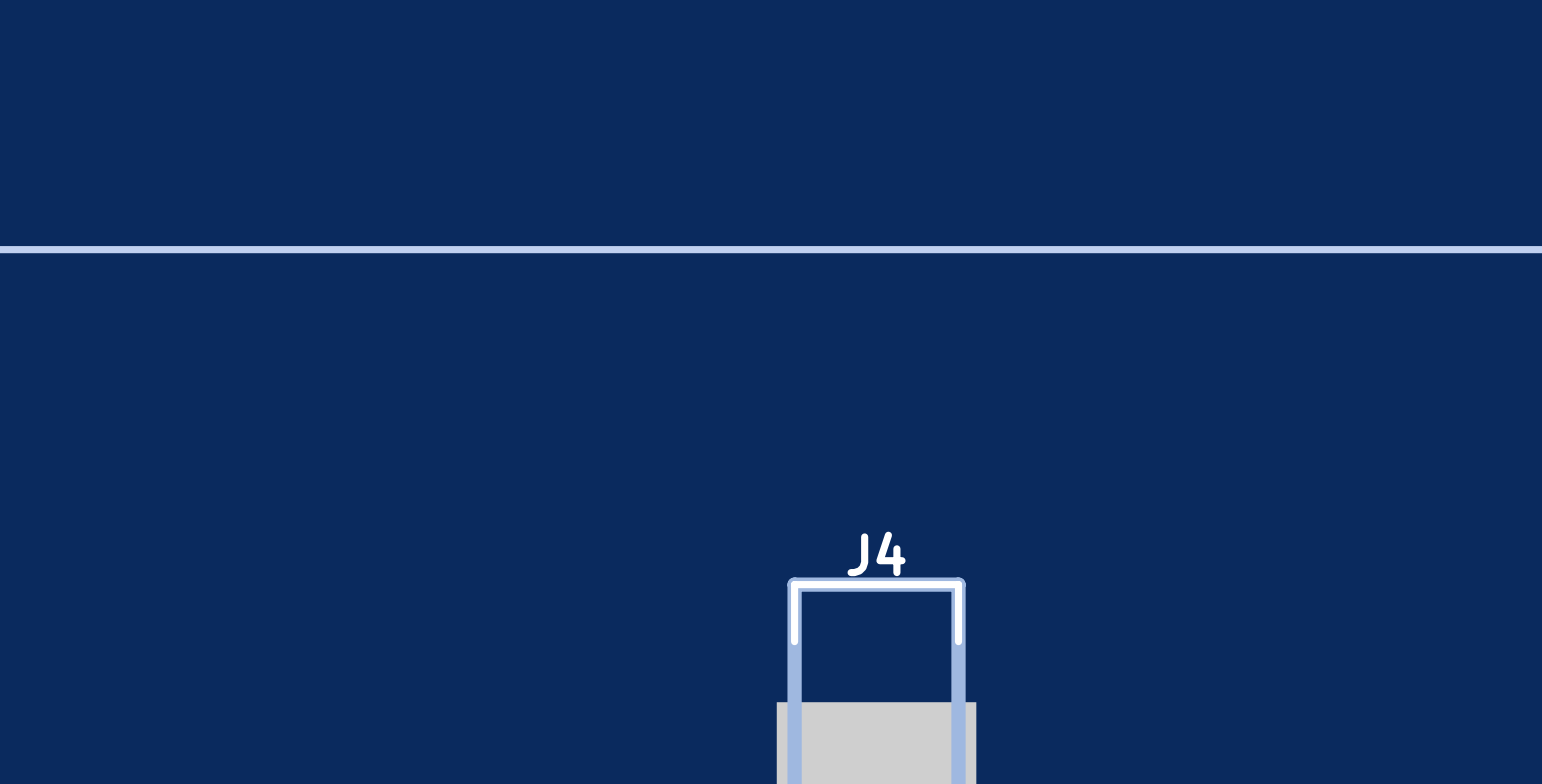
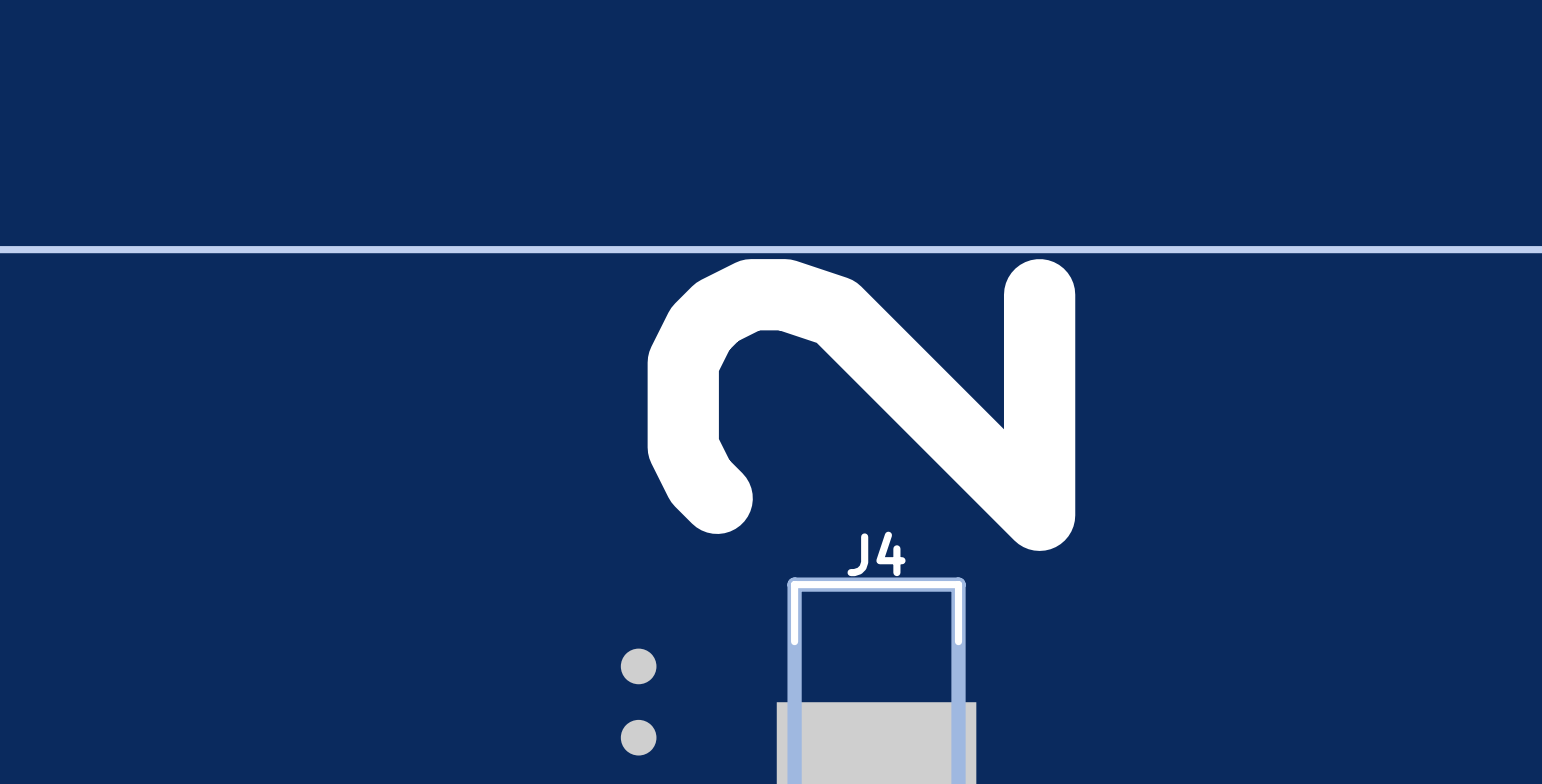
text: none -> 2 (861, 405)
part: none -> (638, 702)

